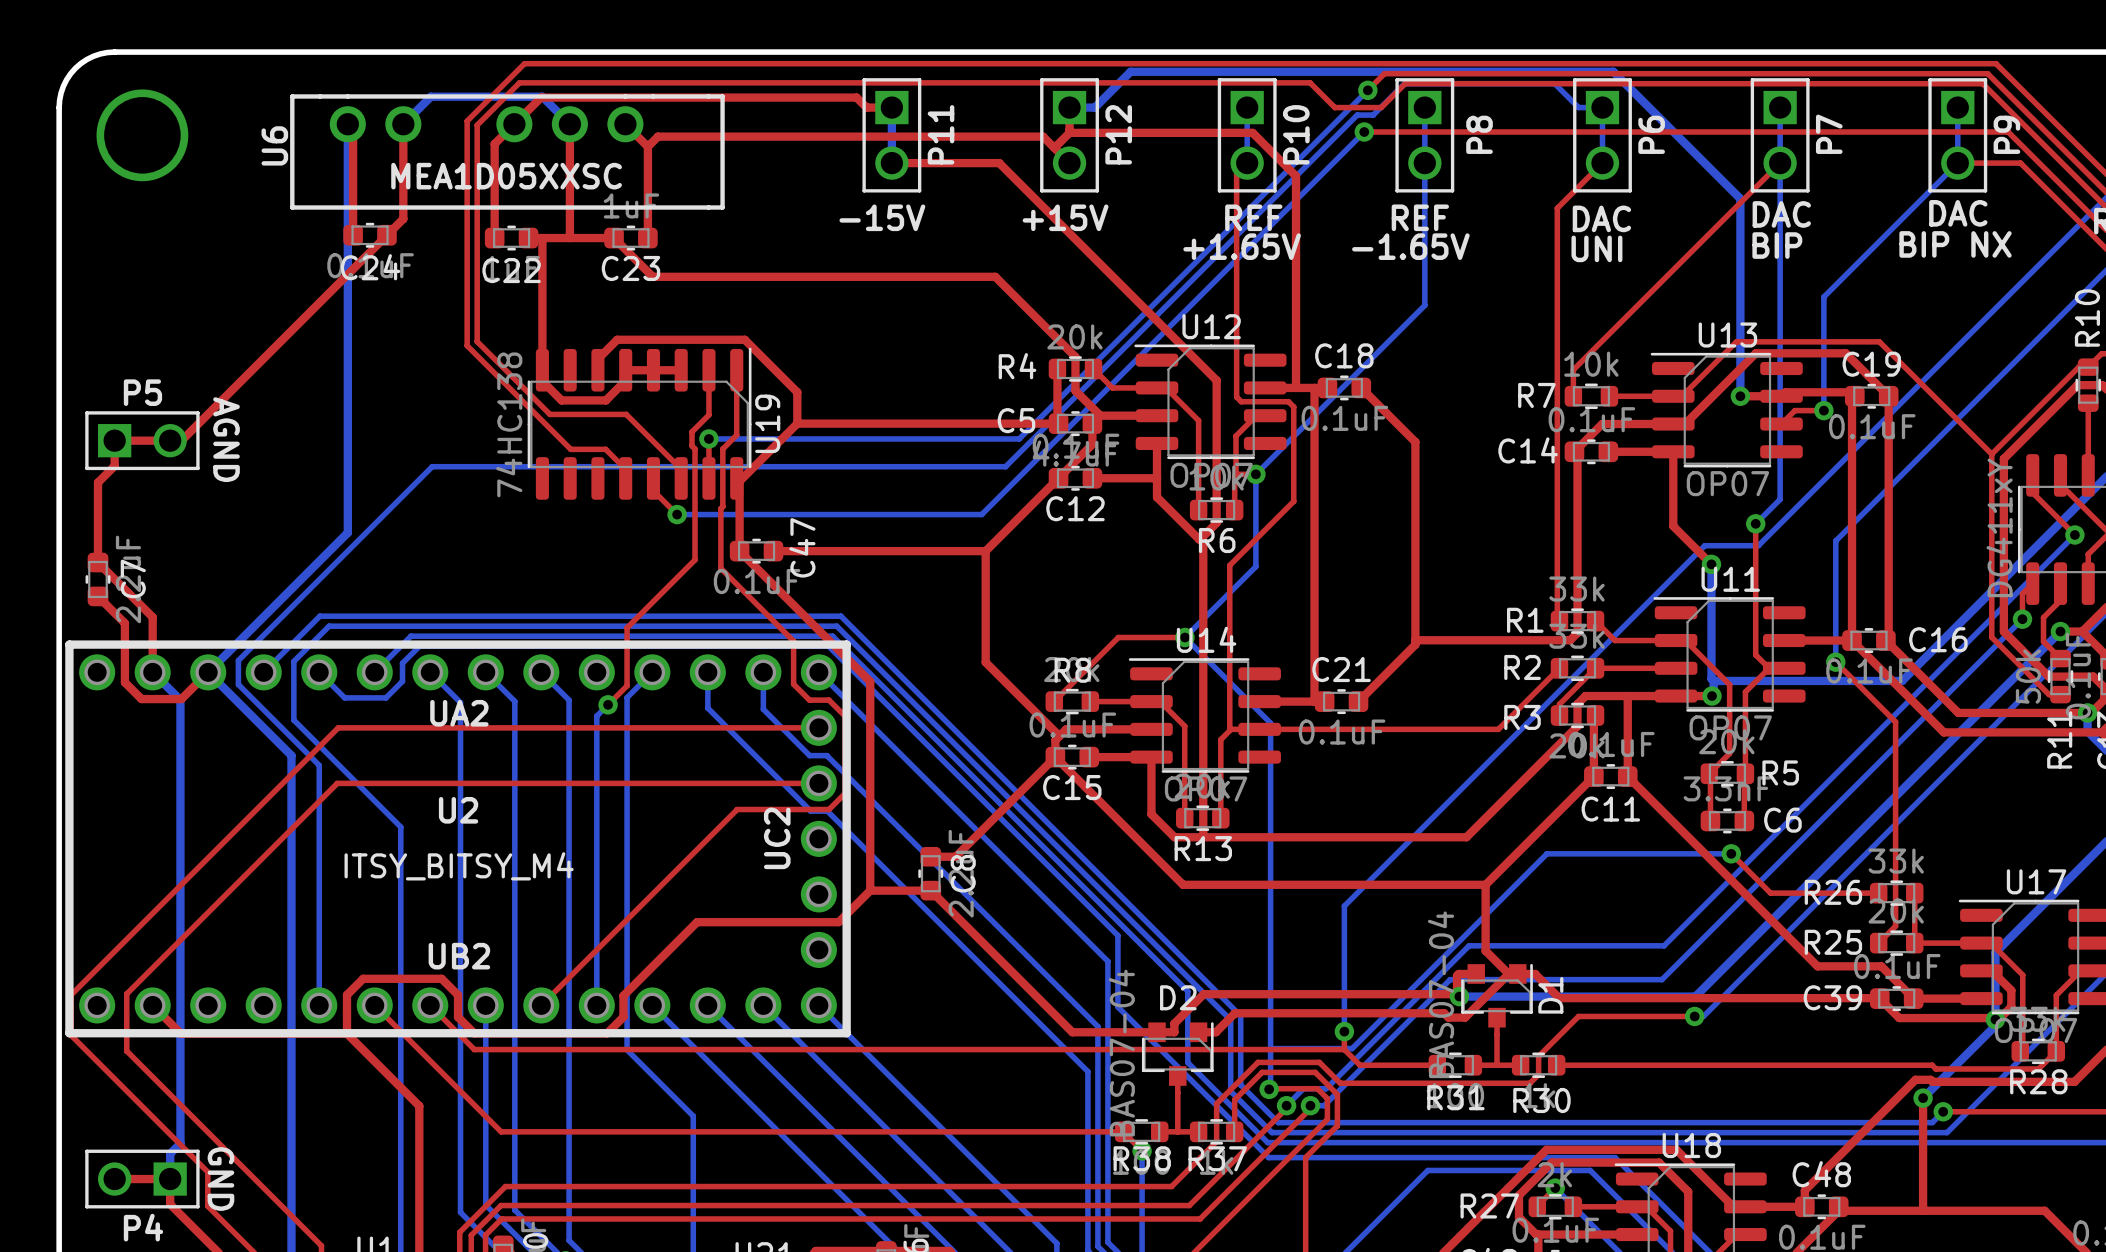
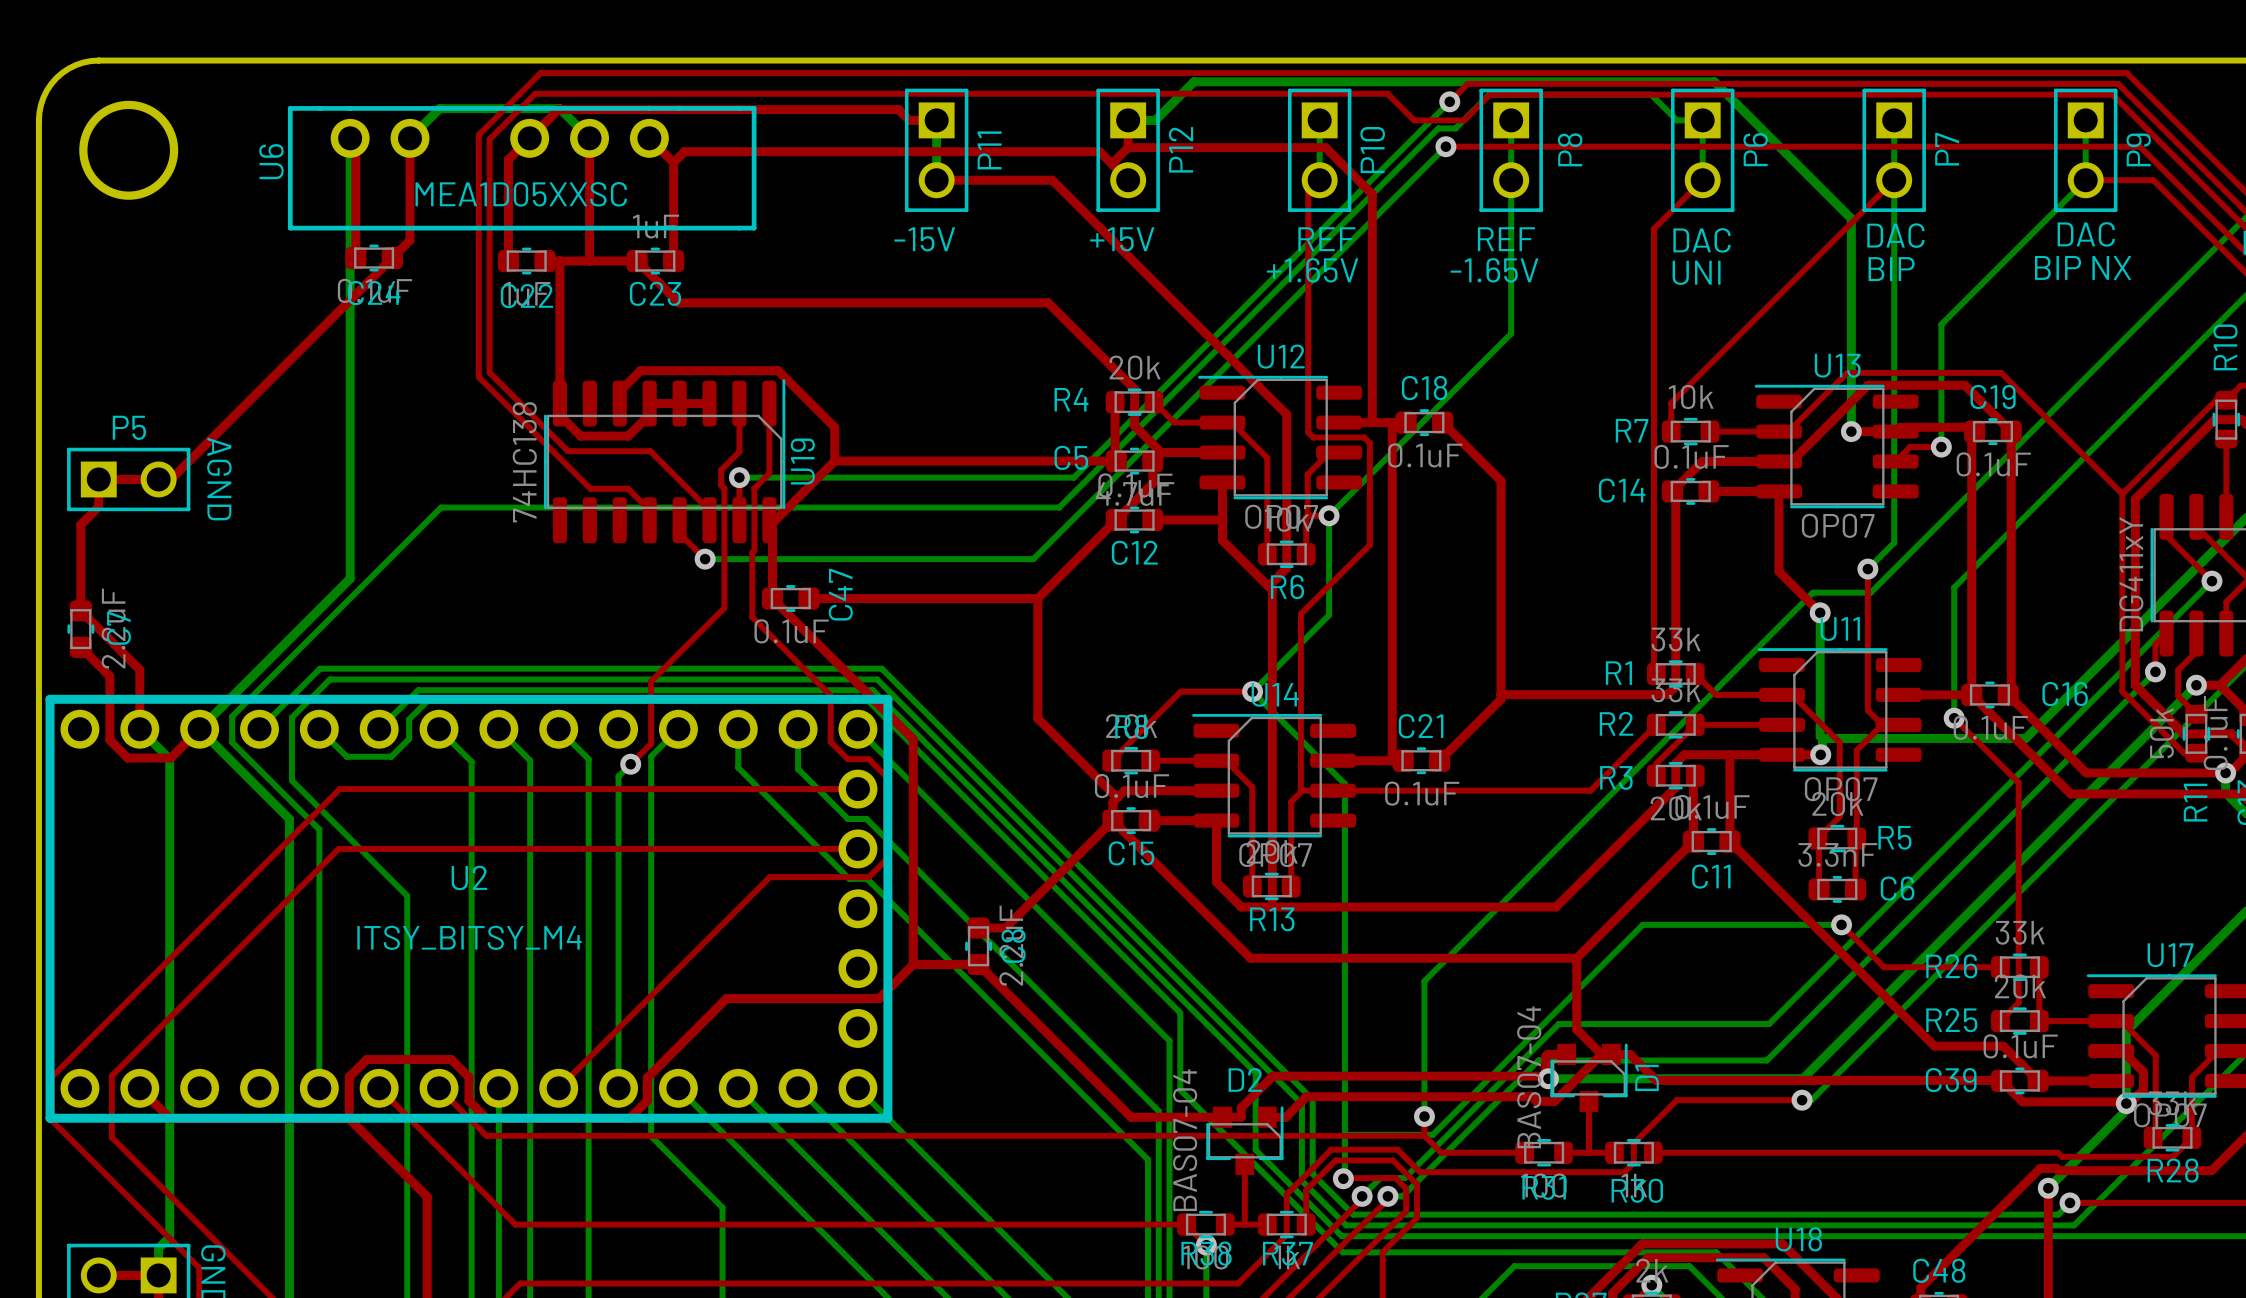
UA2: (458, 672) -> none
UC2: (818, 838) -> none
UB2: (458, 1005) -> none

